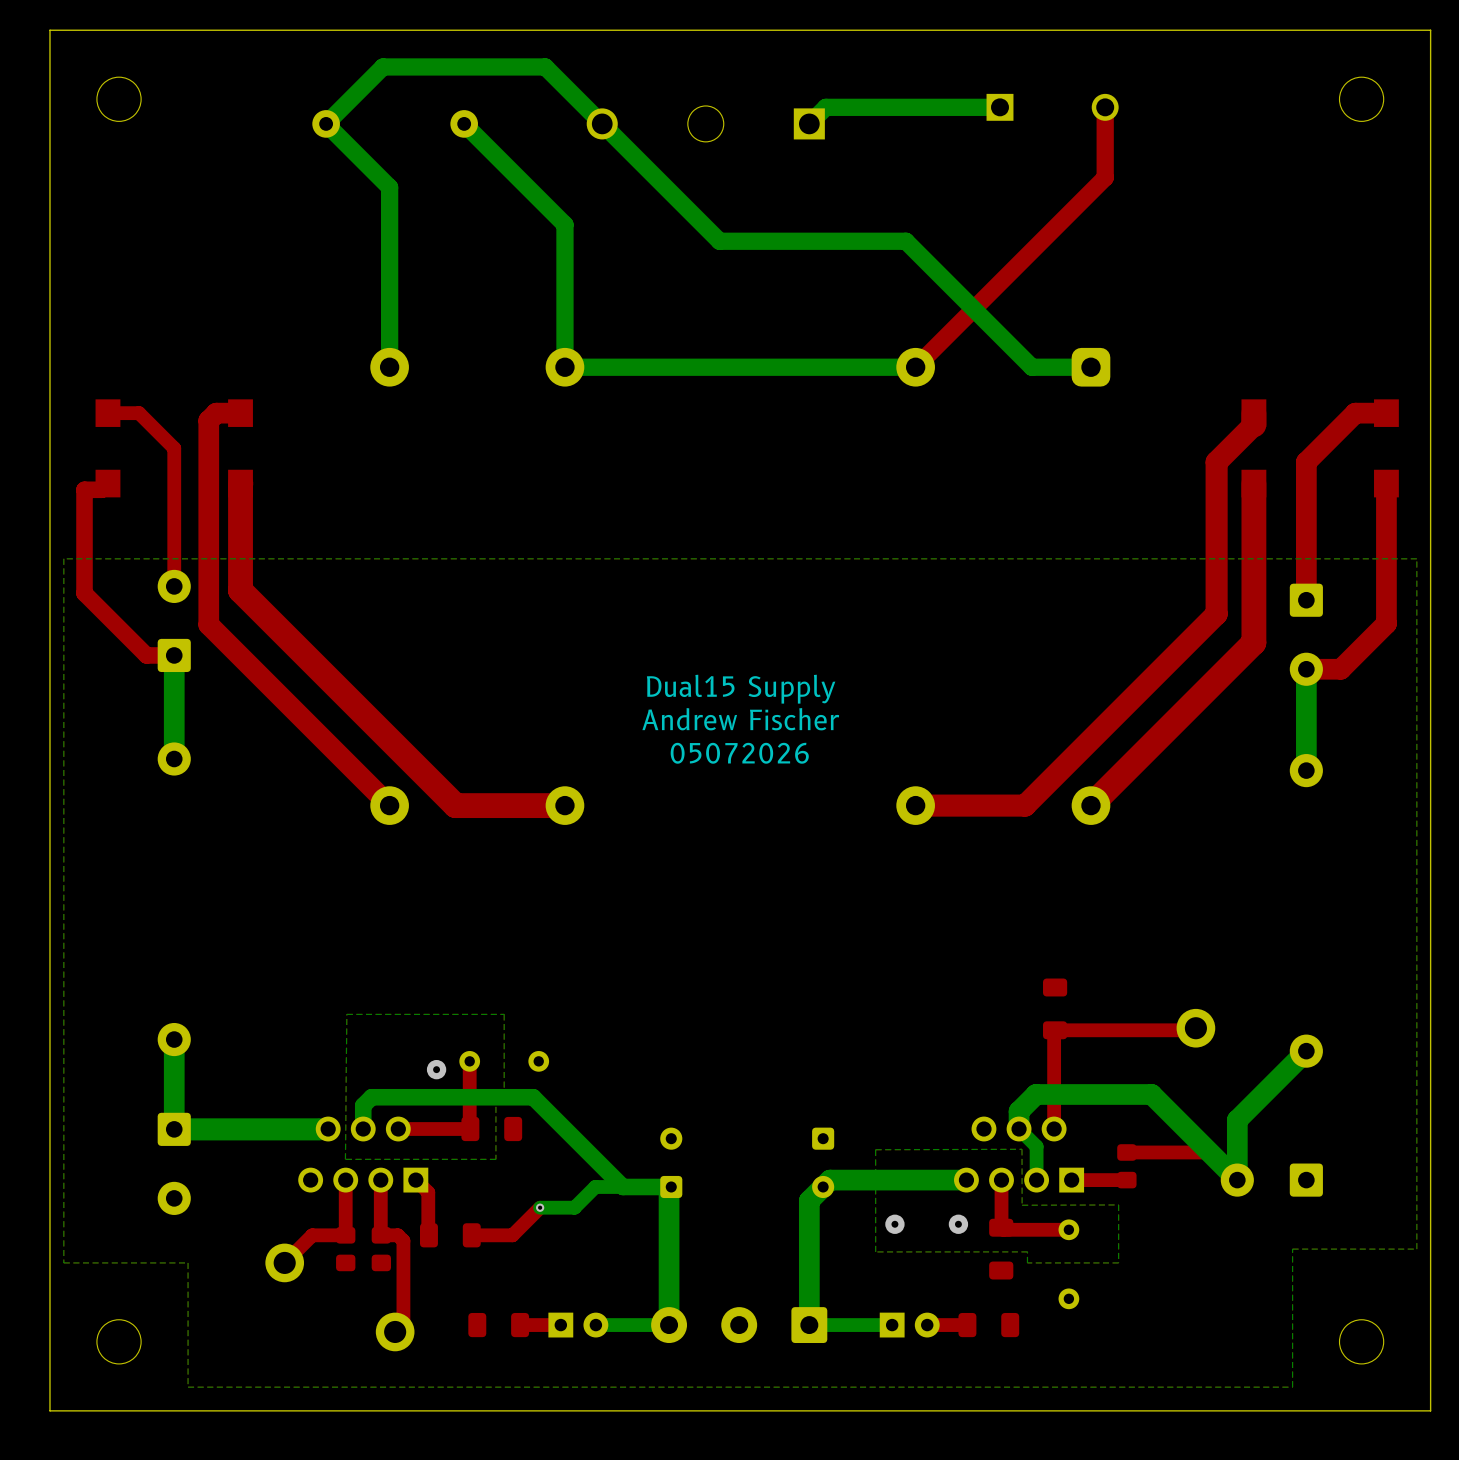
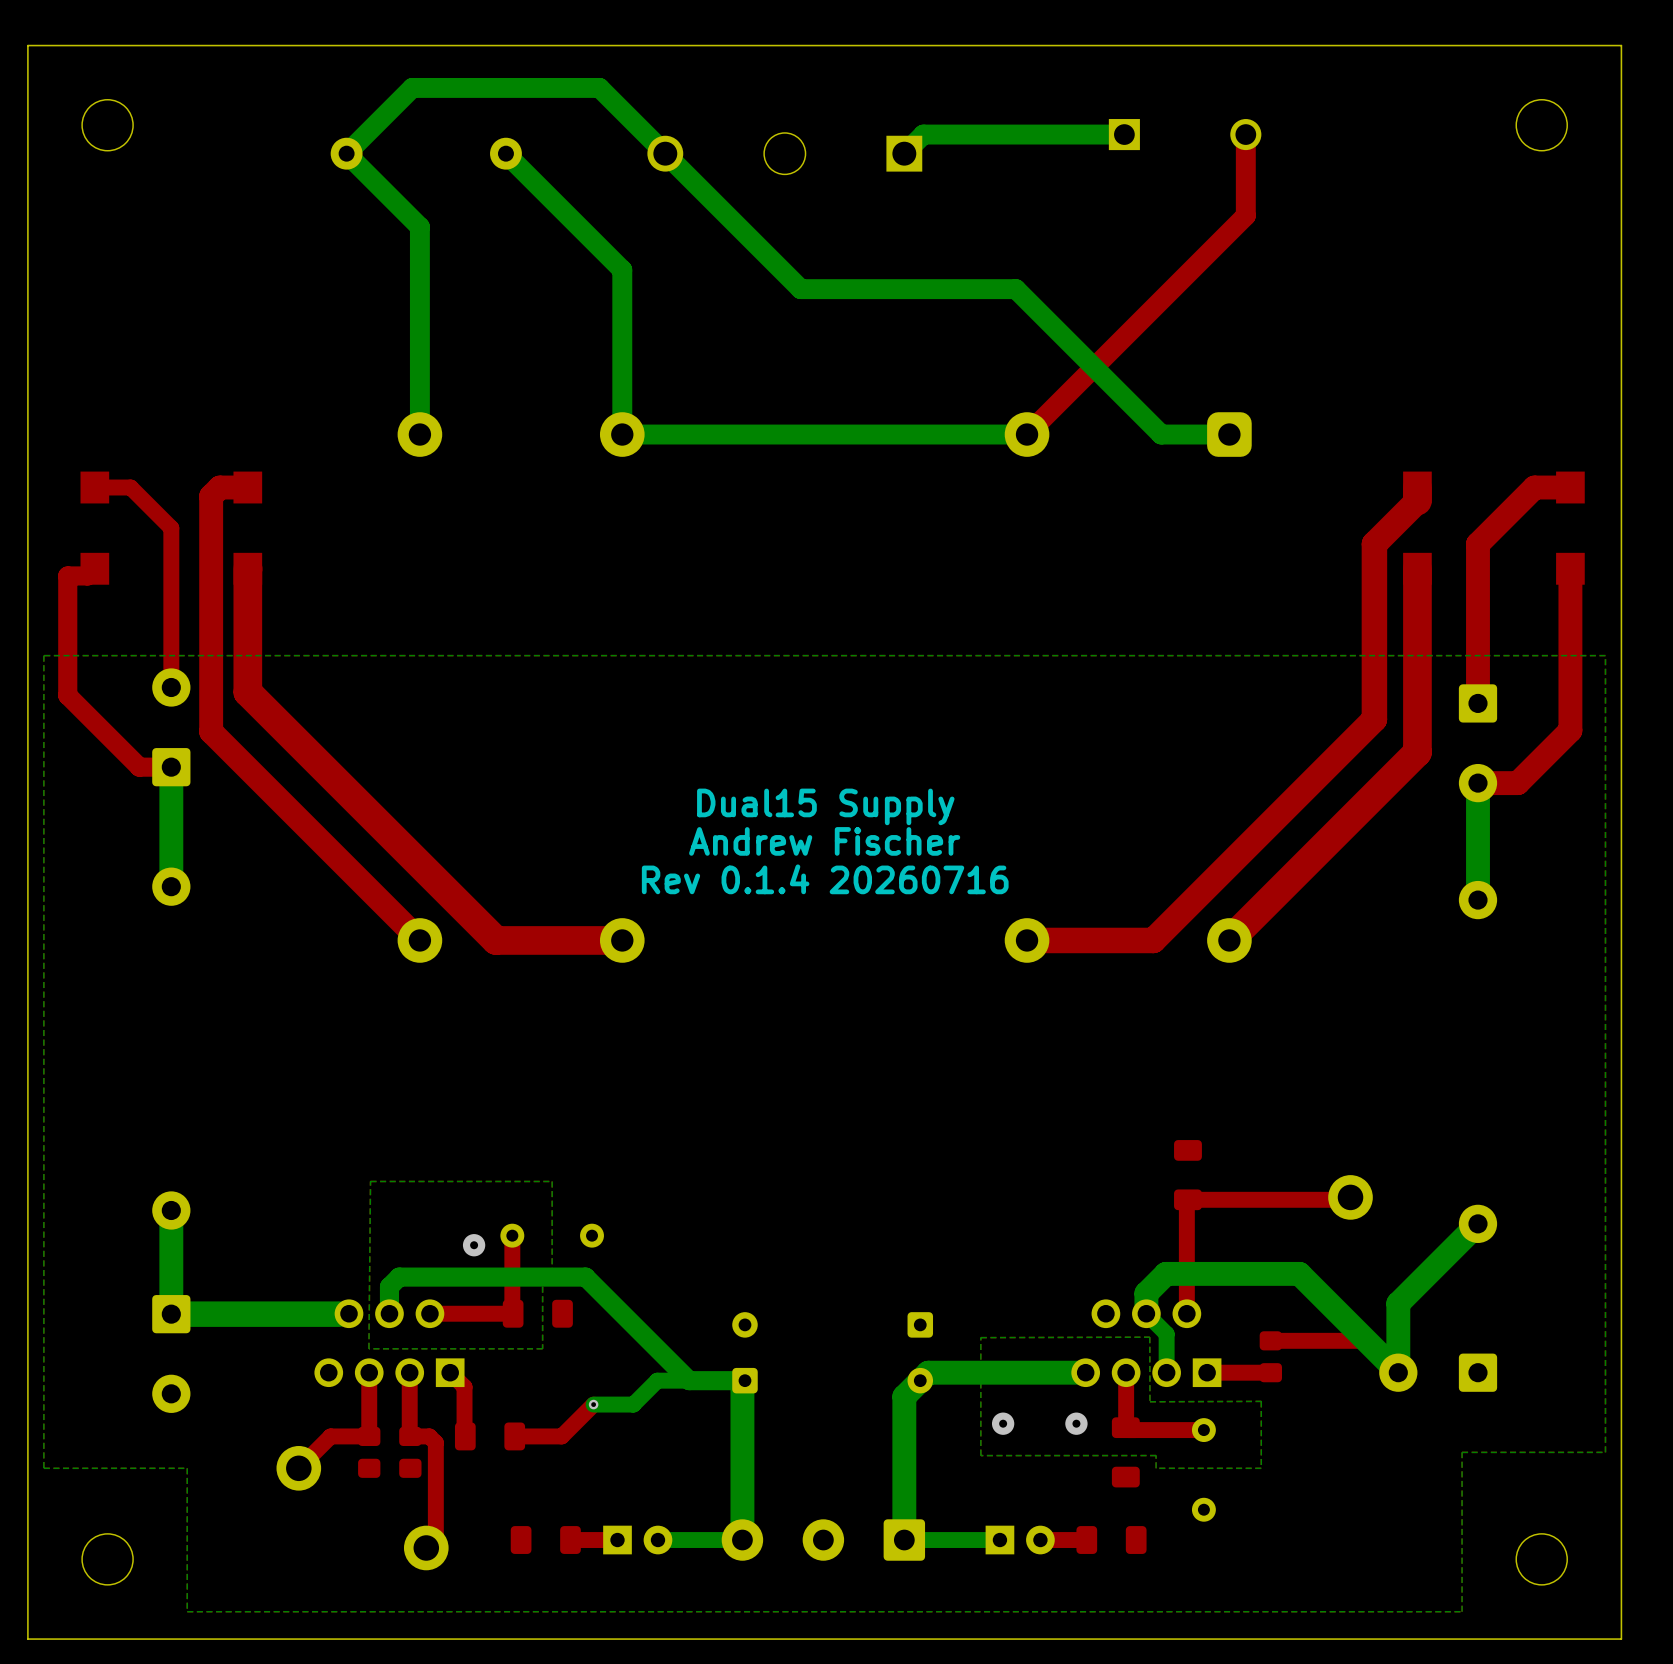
text: 05072026 (739, 753) -> Rev 0.1.4 20260716 (825, 879)

